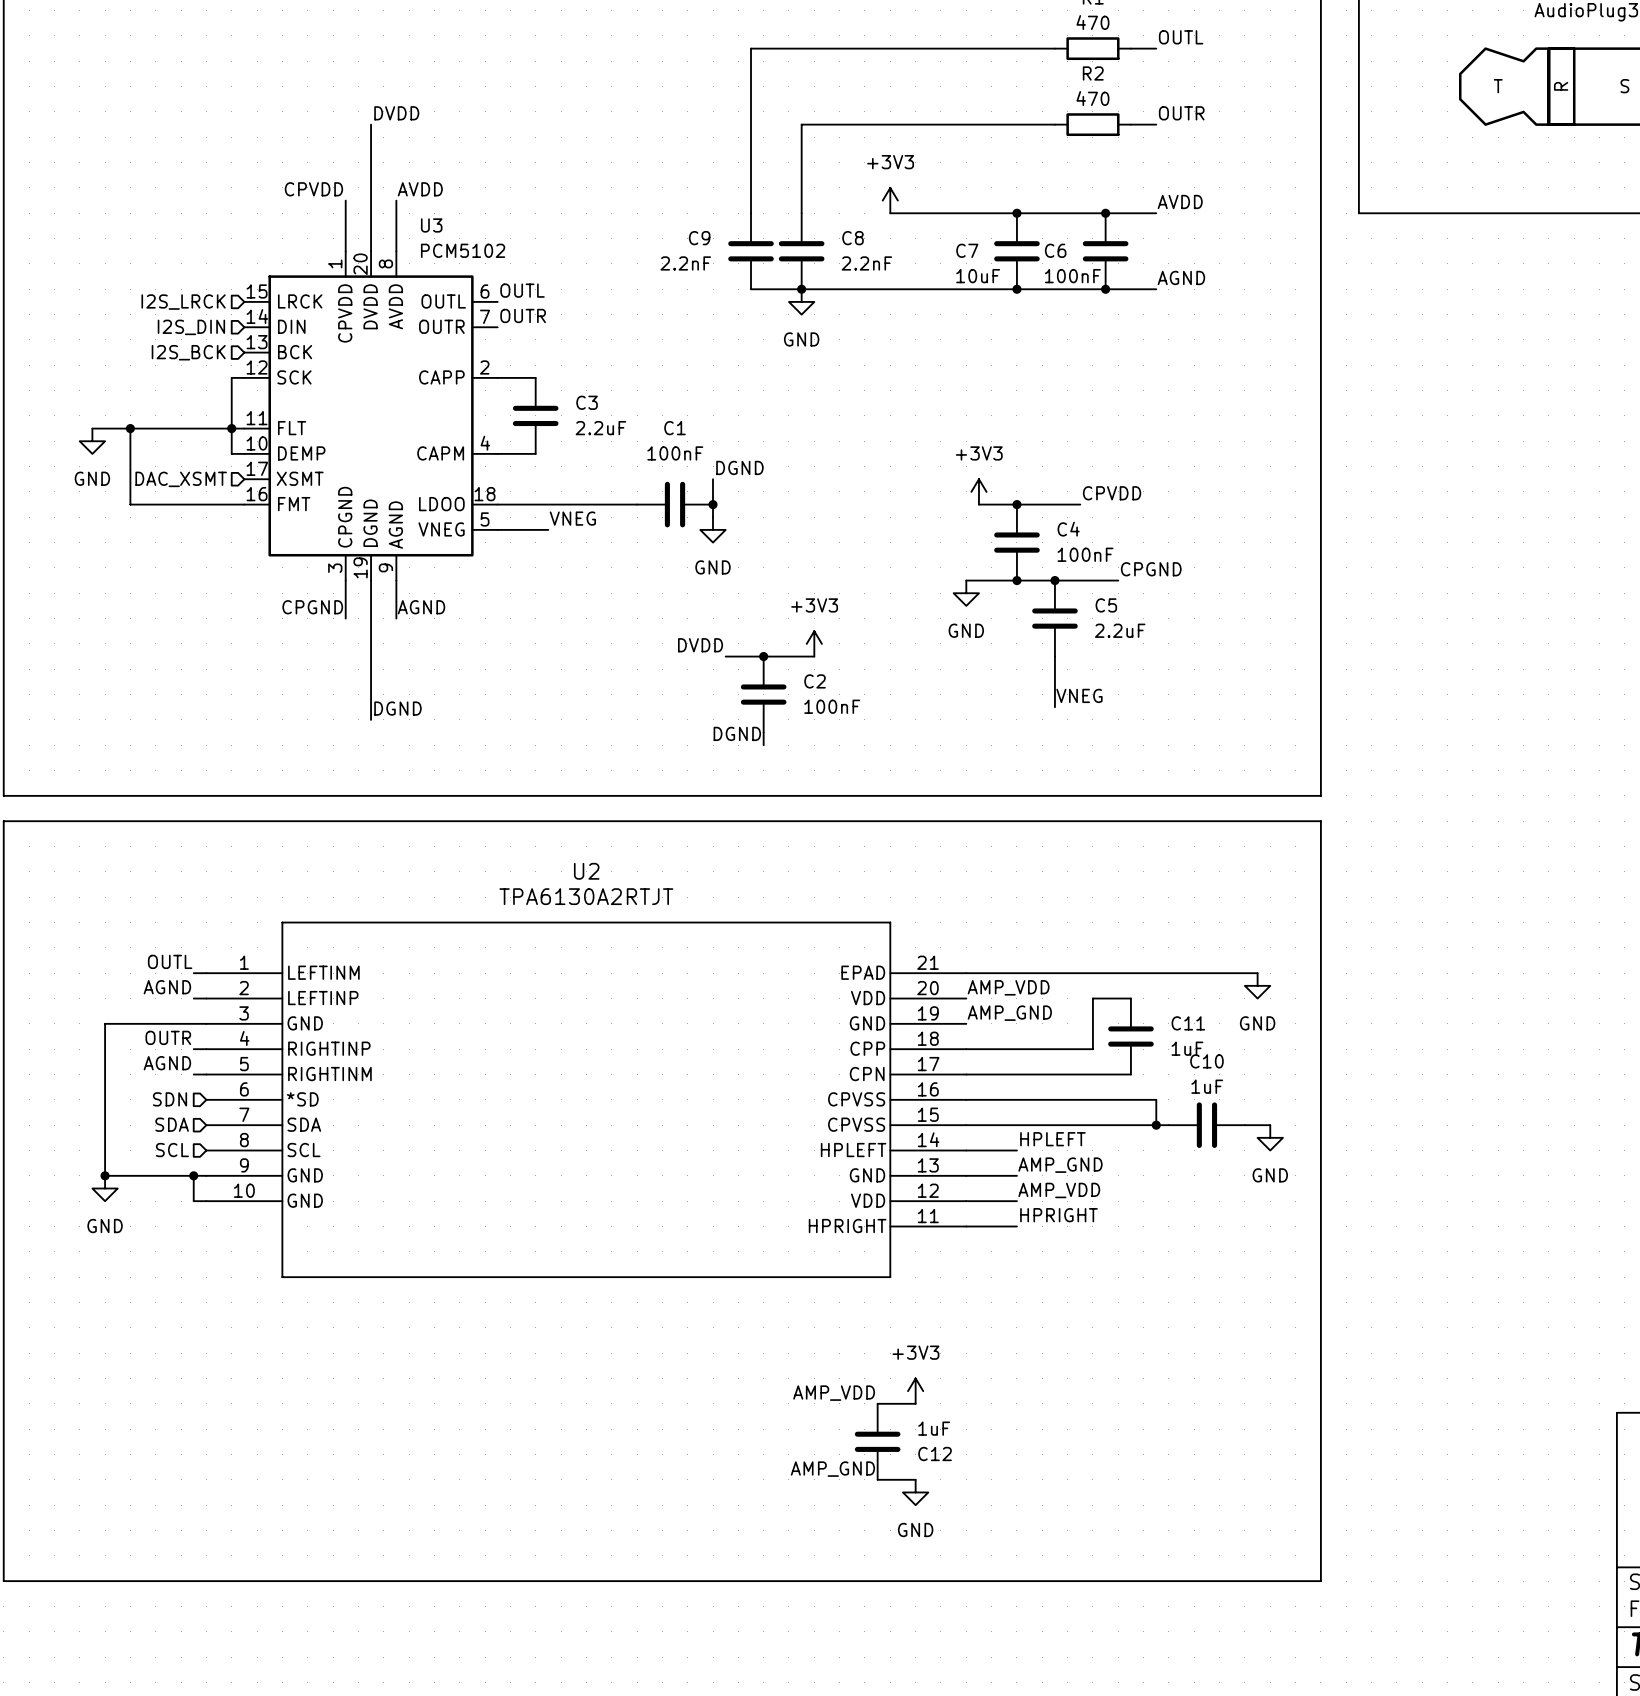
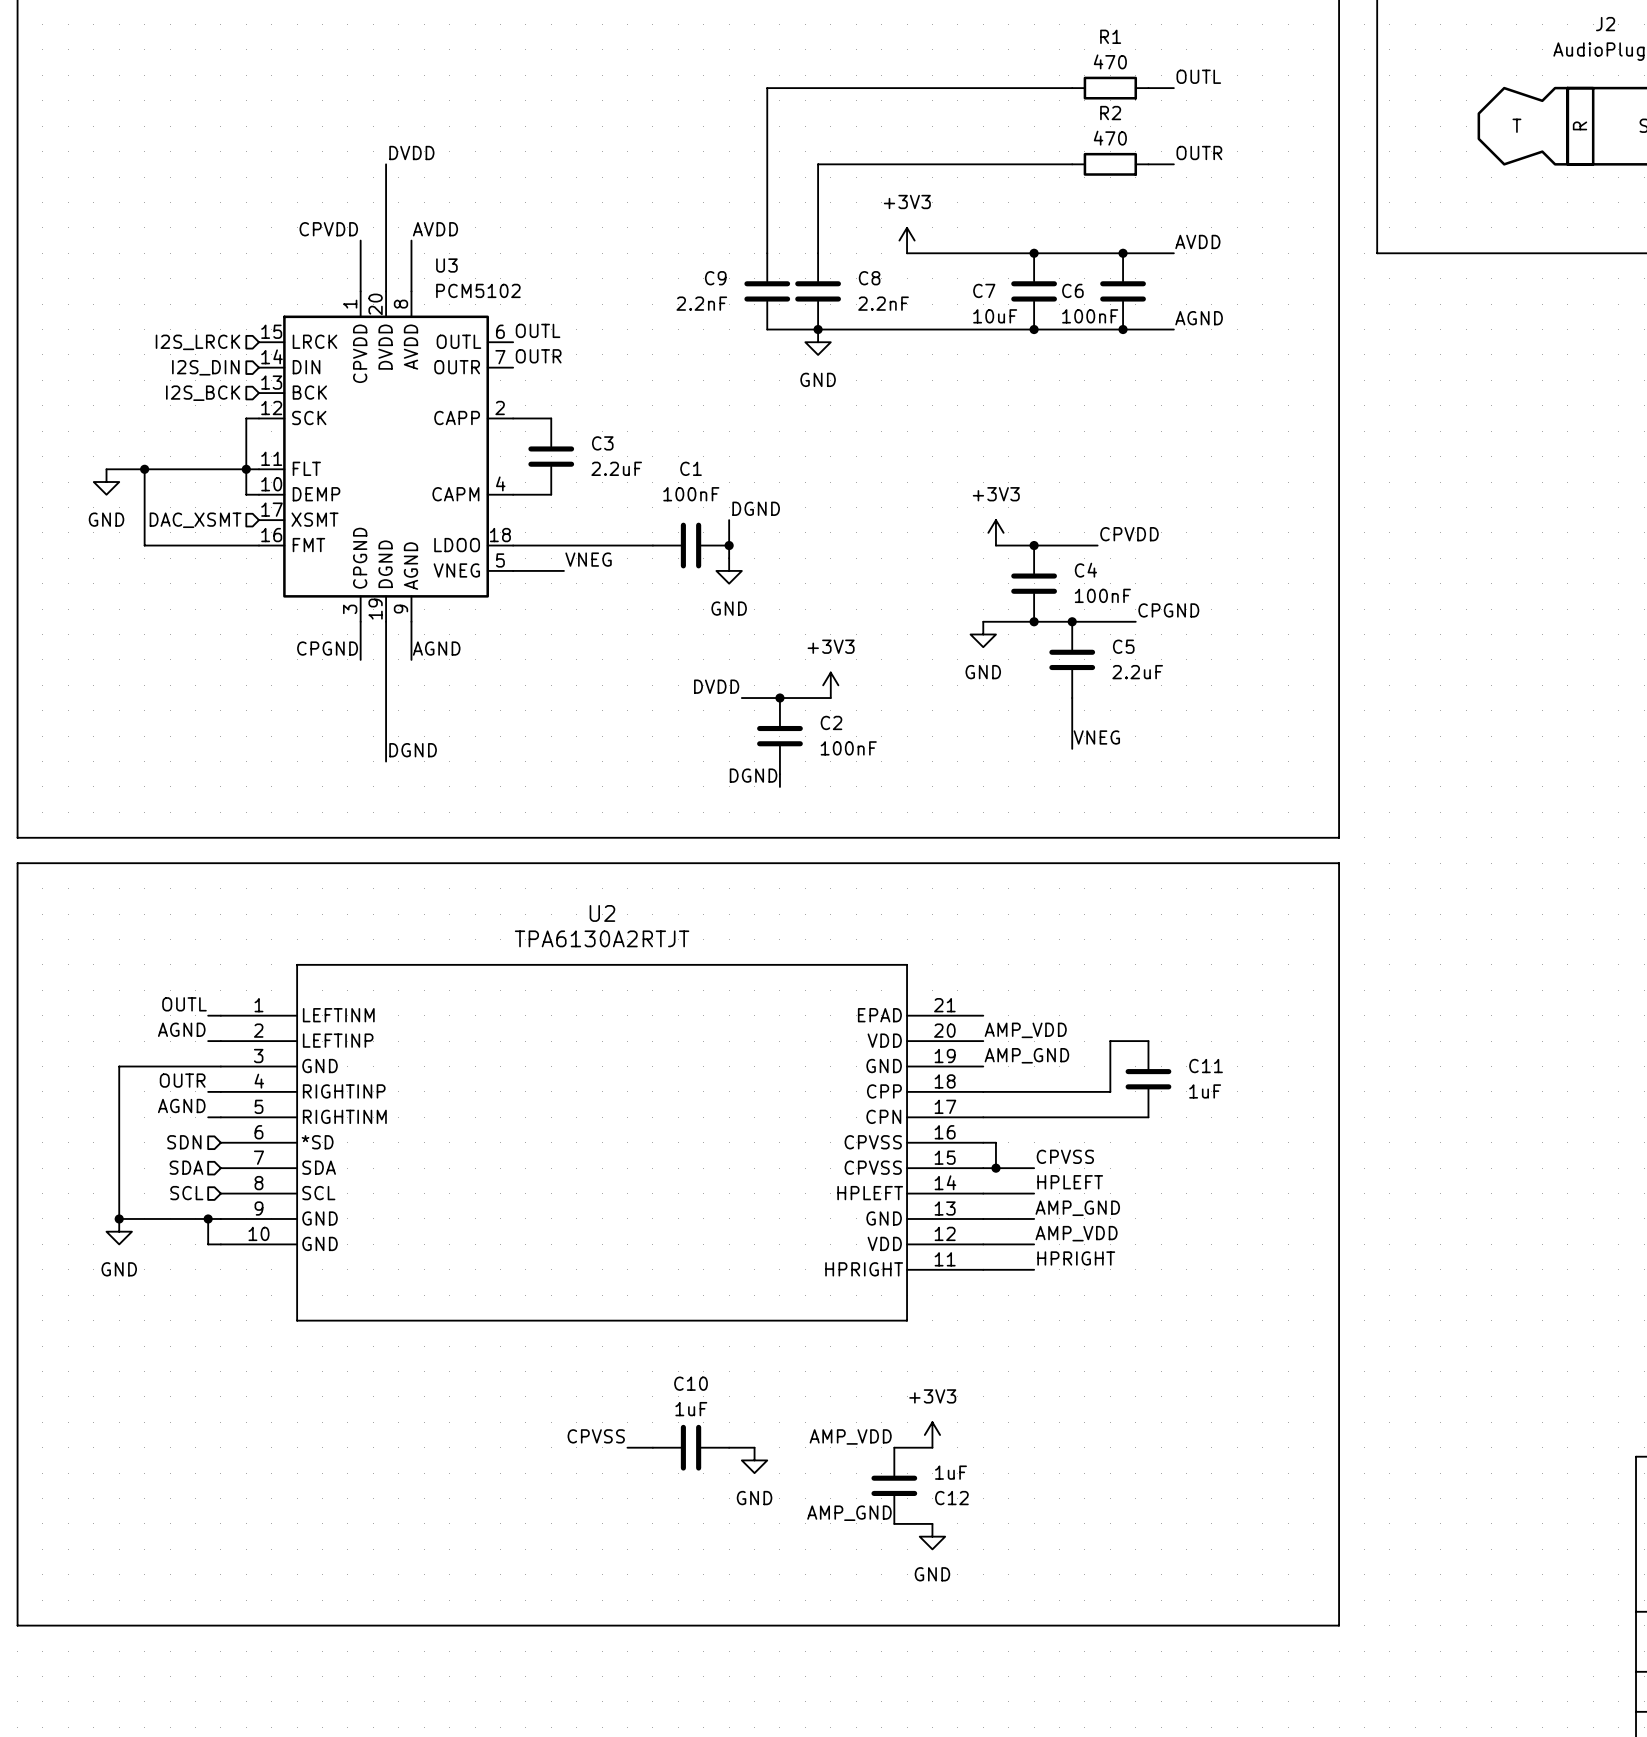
wire: (966, 973) (1257, 973) -> none
power symbol: GND (1257, 985) -> none
wire: (978, 1099) (1156, 1099) (1156, 1125) -> (995, 1142) (995, 1168)
label: none -> CPVSS (1065, 1156)
junction: none -> (995, 1168)
wire: (1016, 1125) (1168, 1125) -> none
junction: (1156, 1125) -> none
C10 position: (1206, 1125) -> (691, 1447)
wire: (1244, 1125) (1270, 1125) -> none
power symbol: GND (1270, 1137) -> none
label: none -> CPVSS (596, 1436)
wire: none -> (627, 1447) (652, 1447)
wire: none -> (729, 1447) (754, 1447)
power symbol: none -> GND (754, 1460)

